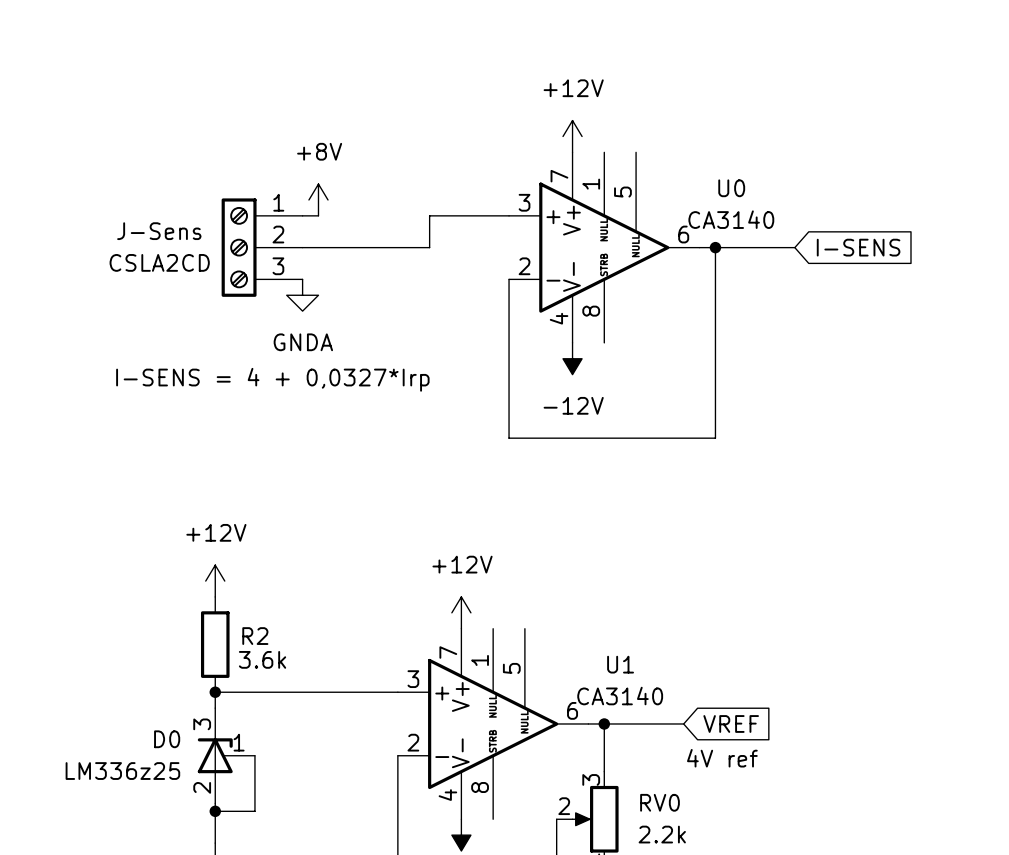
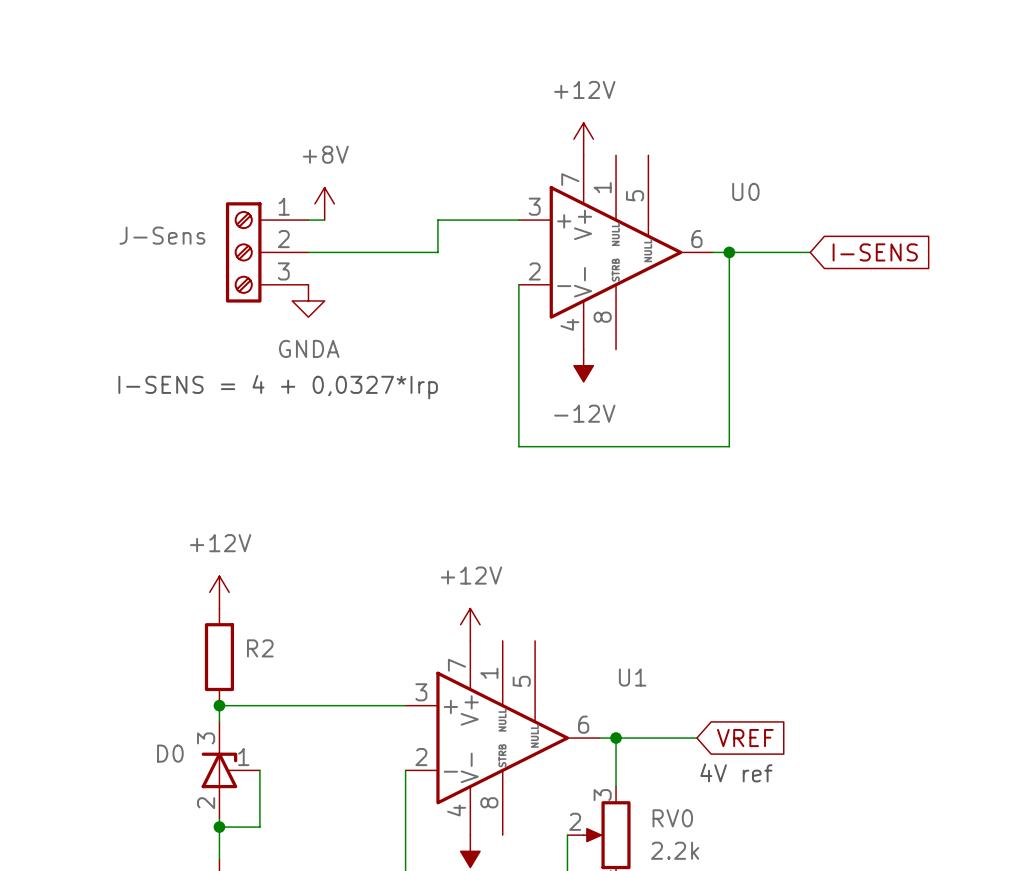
U0 value: CA3140 (731, 219) -> none
J-Sens value: CSLA2CD (159, 262) -> none
R2 value: 3.6k (262, 659) -> none
U1 value: CA3140 (620, 696) -> none
D0 value: LM336z25 (122, 771) -> none

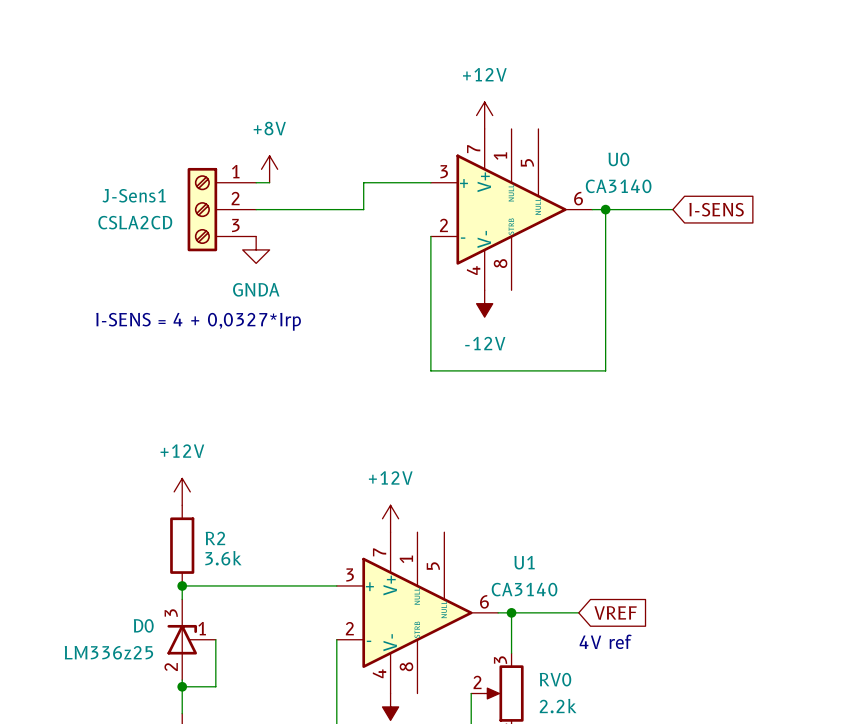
U0 value: none -> CA3140 (618, 186)
J-Sens name: J-Sens (162, 235) -> J-Sens1 (134, 195)
J-Sens value: none -> CSLA2CD (135, 222)
R2 value: none -> 3.6k (223, 558)
U1 value: none -> CA3140 (524, 589)
D0 value: none -> LM336z25 (108, 652)

